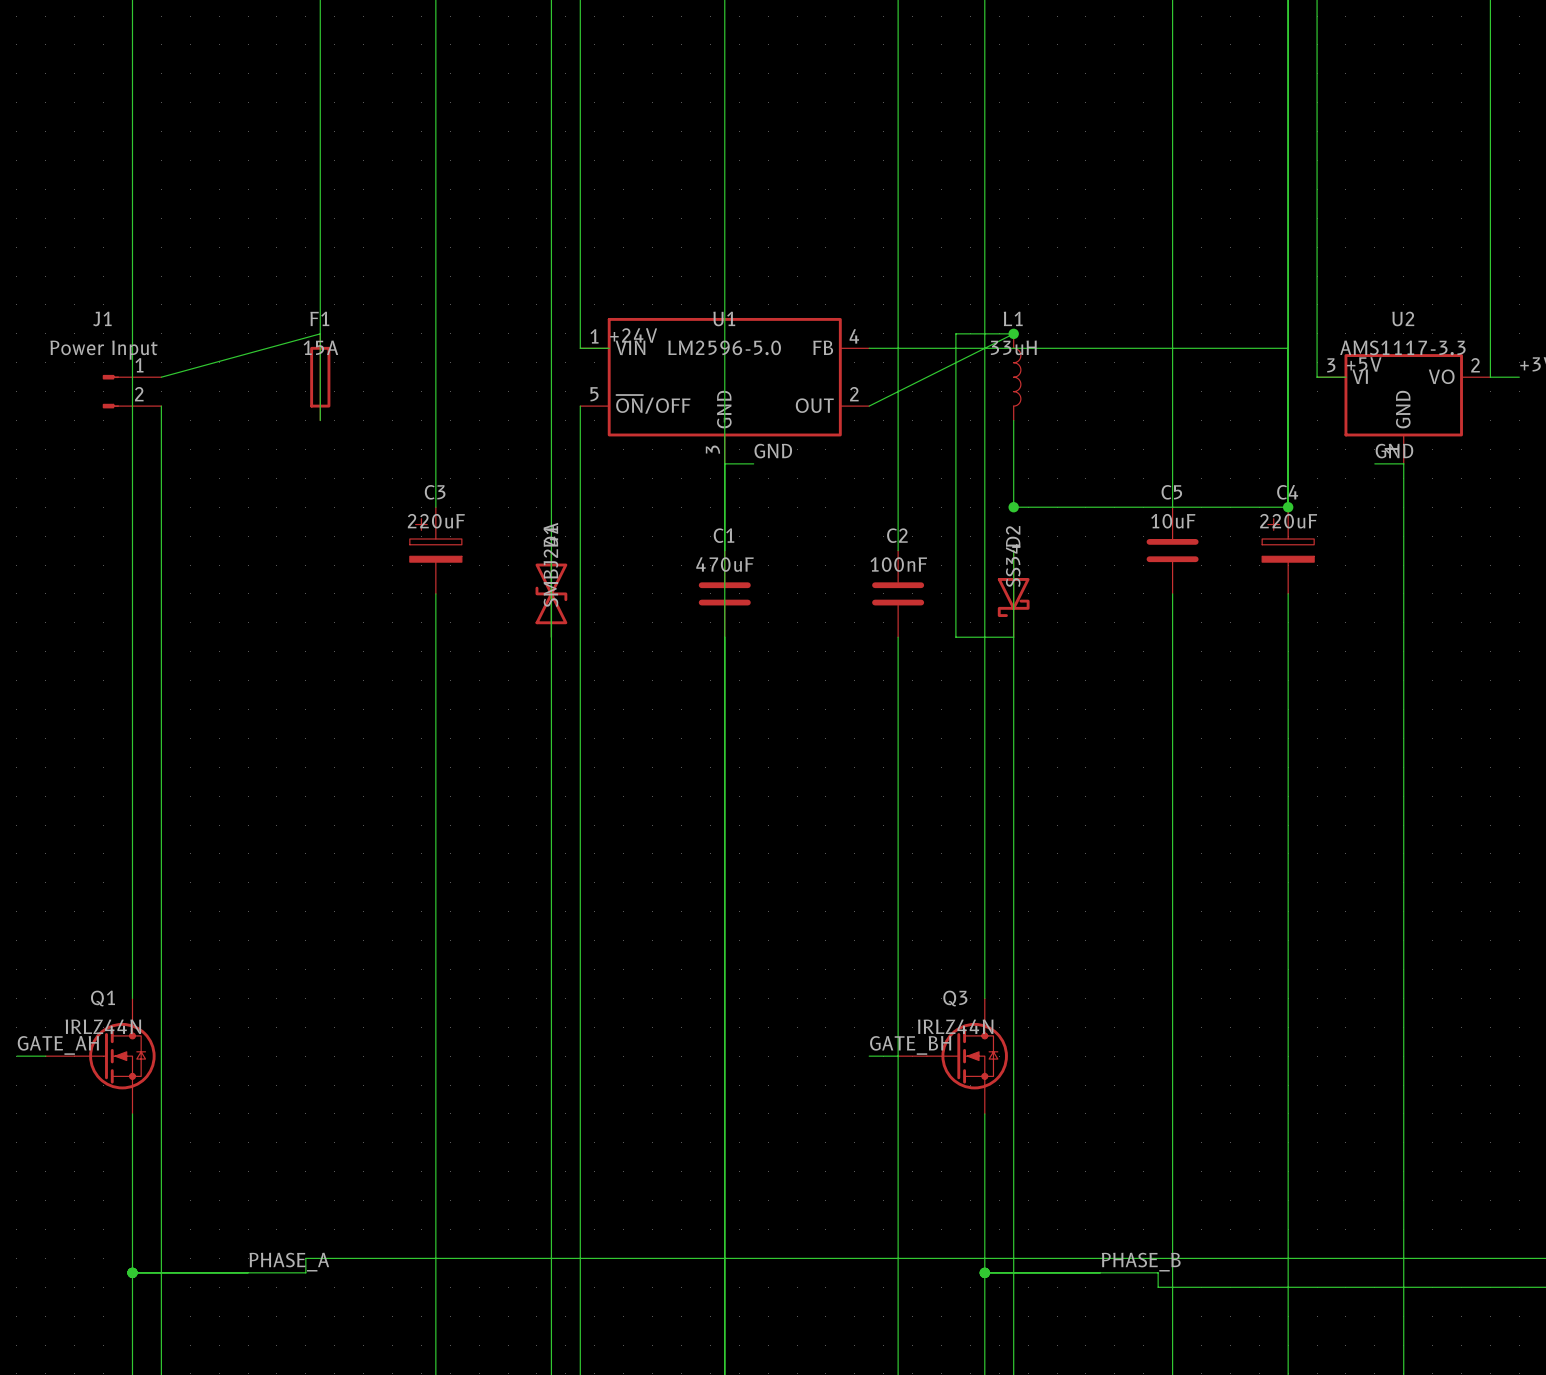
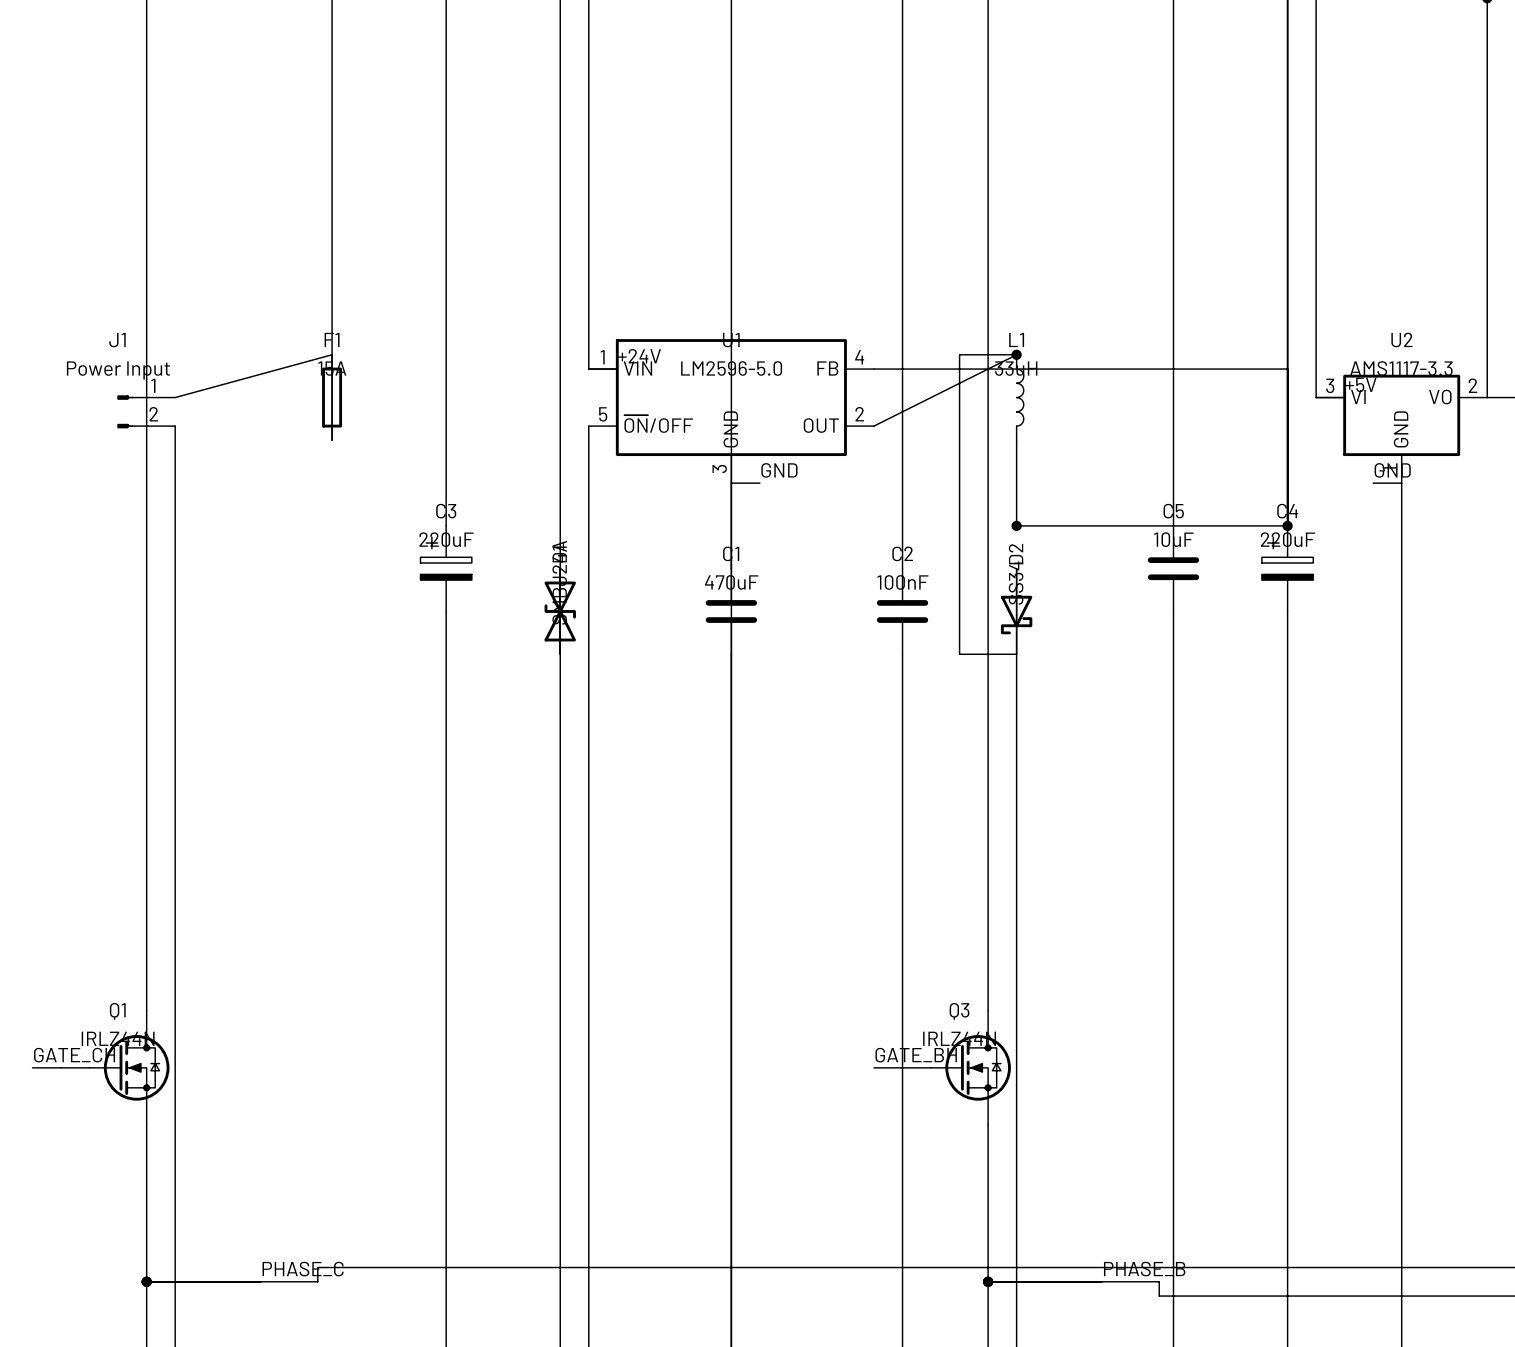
label: GATE_AH (58, 1045) -> GATE_CH (74, 1055)
label: PHASE_A (289, 1262) -> PHASE_C (303, 1269)

